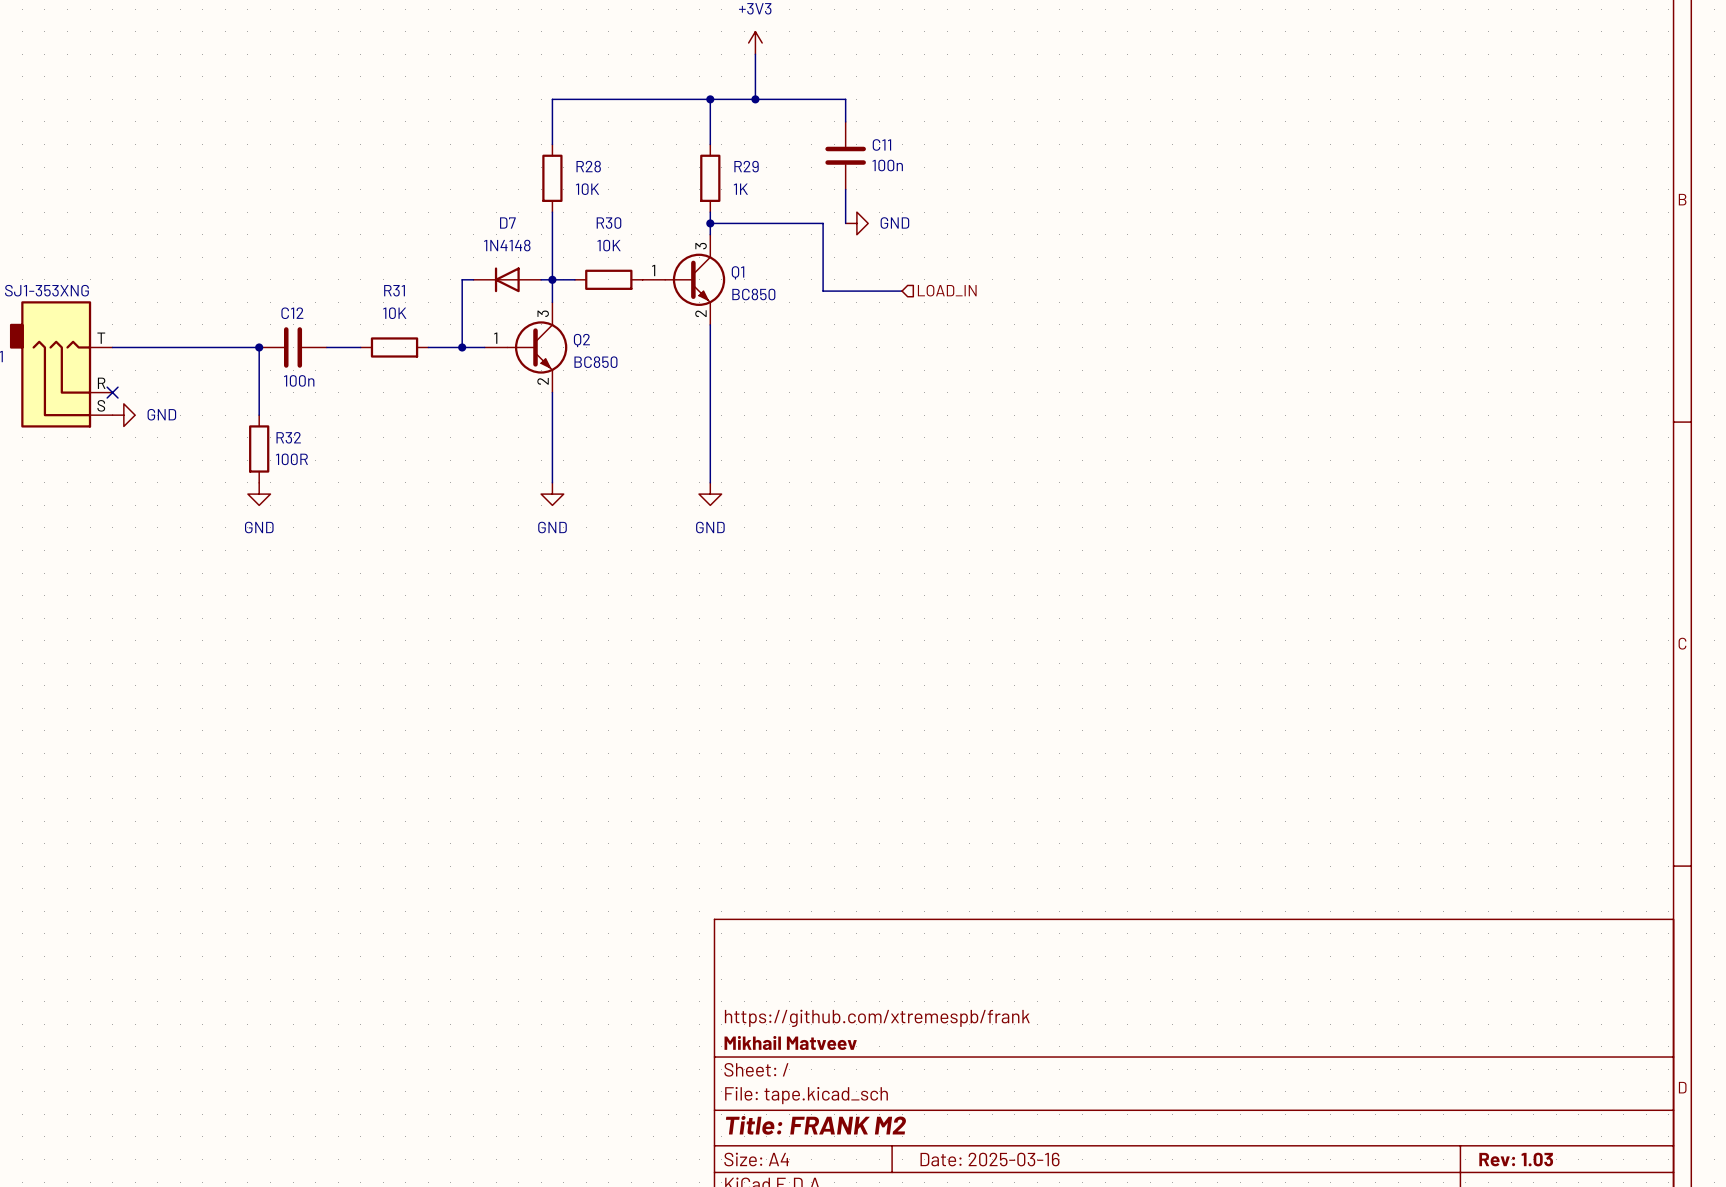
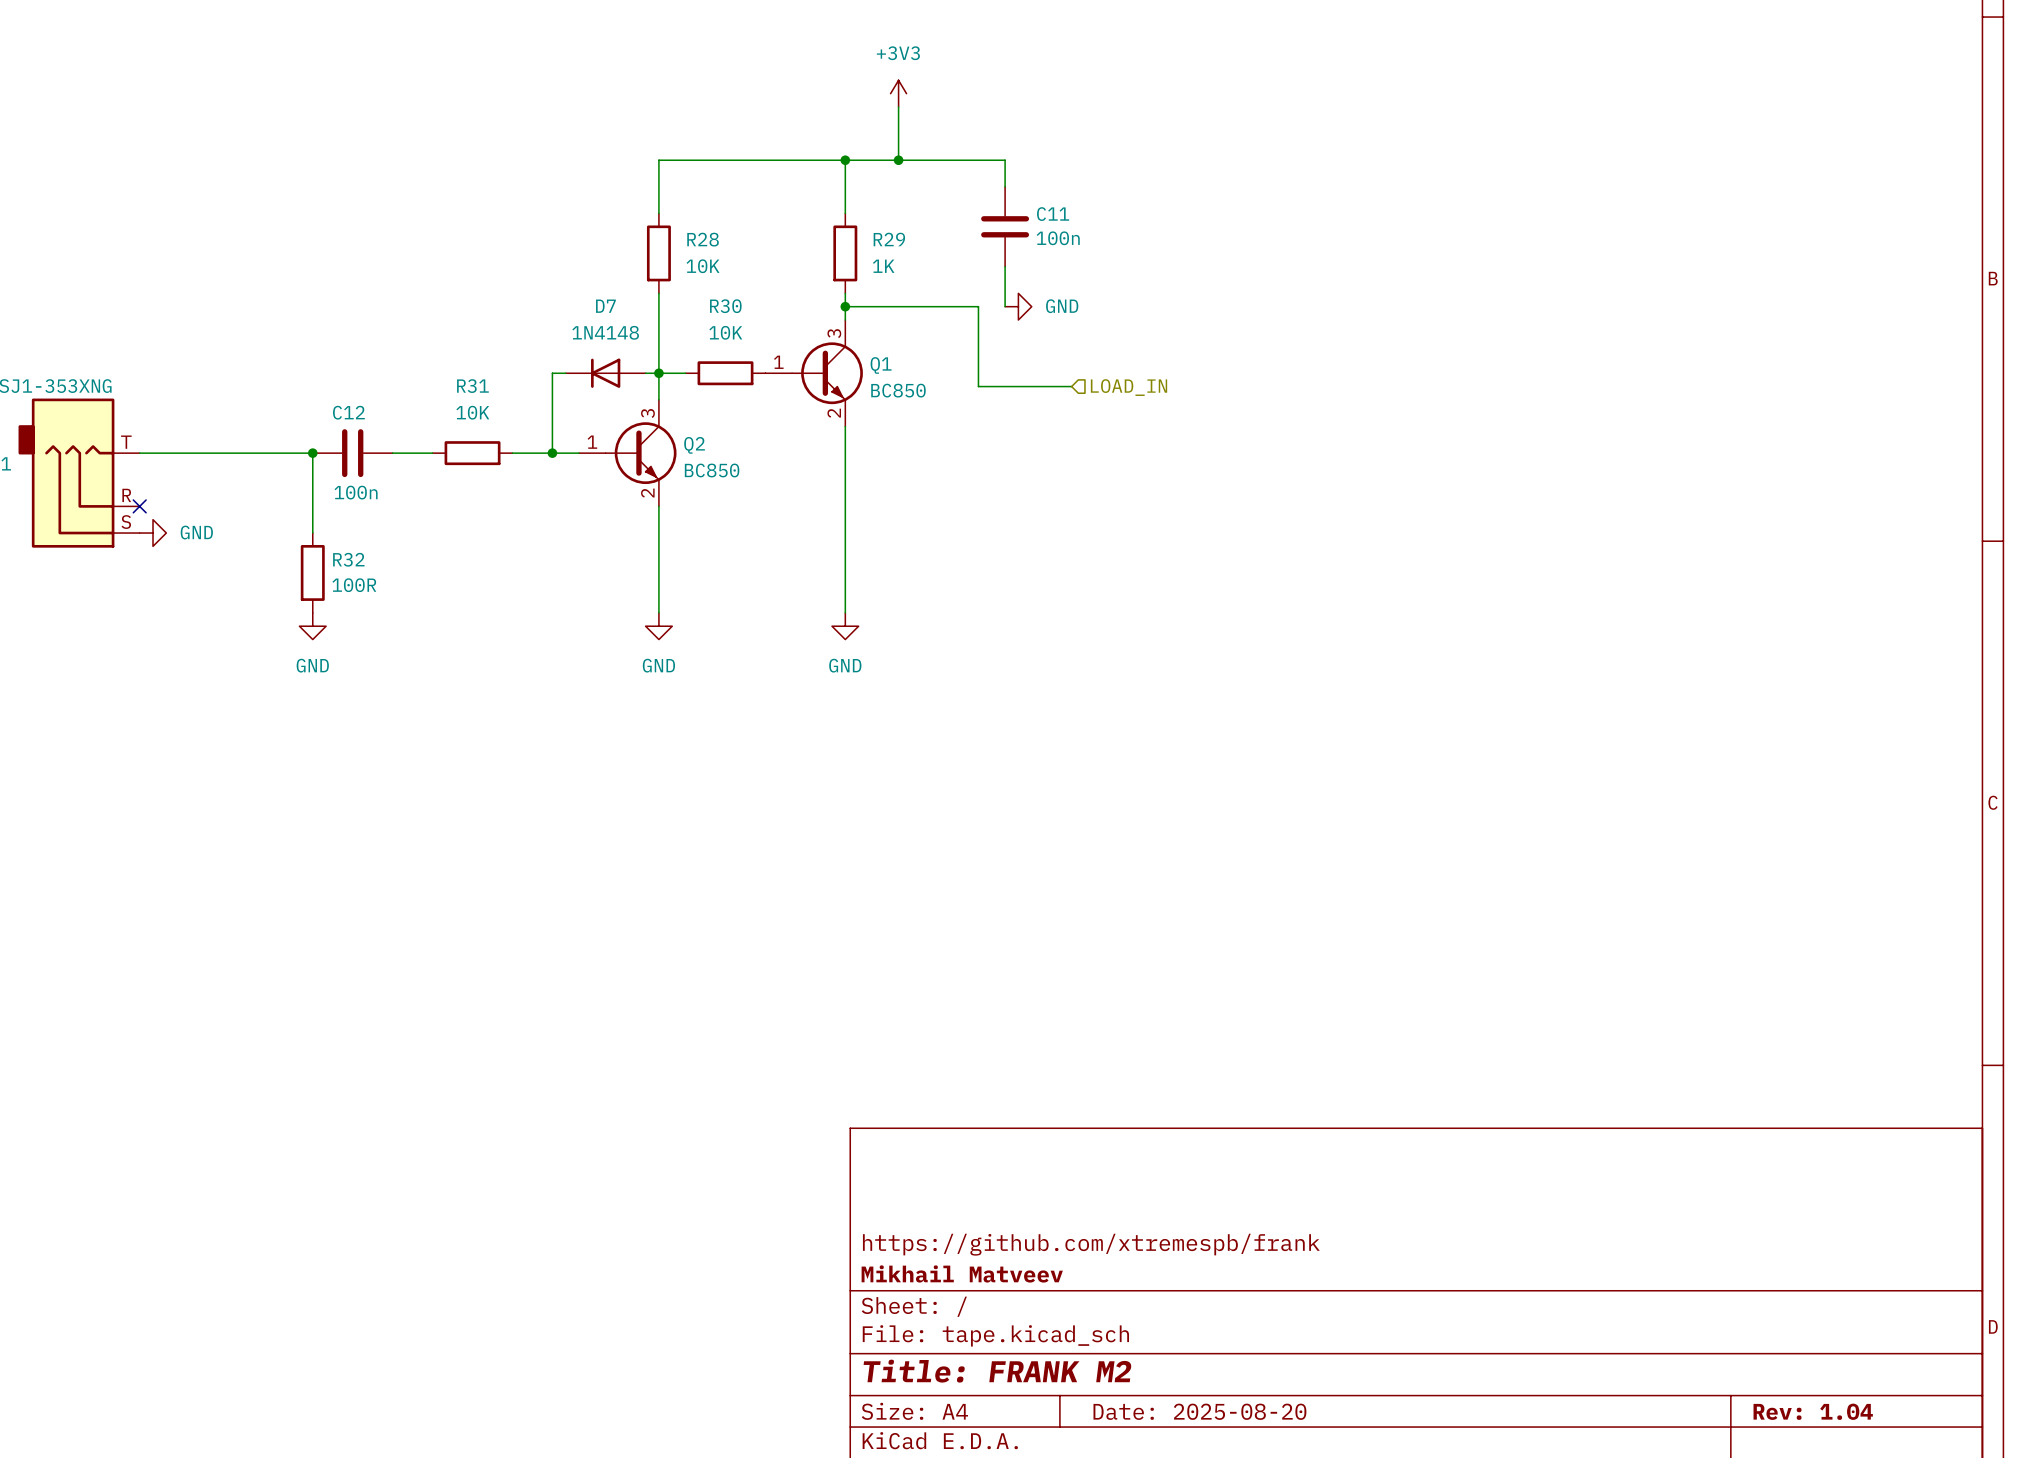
title block: Date: 2025-03-16 (990, 1159) -> Date: 2025-08-20 (1199, 1411)
title block: Rev: 1.03 (1516, 1159) -> Rev: 1.04 (1813, 1411)

